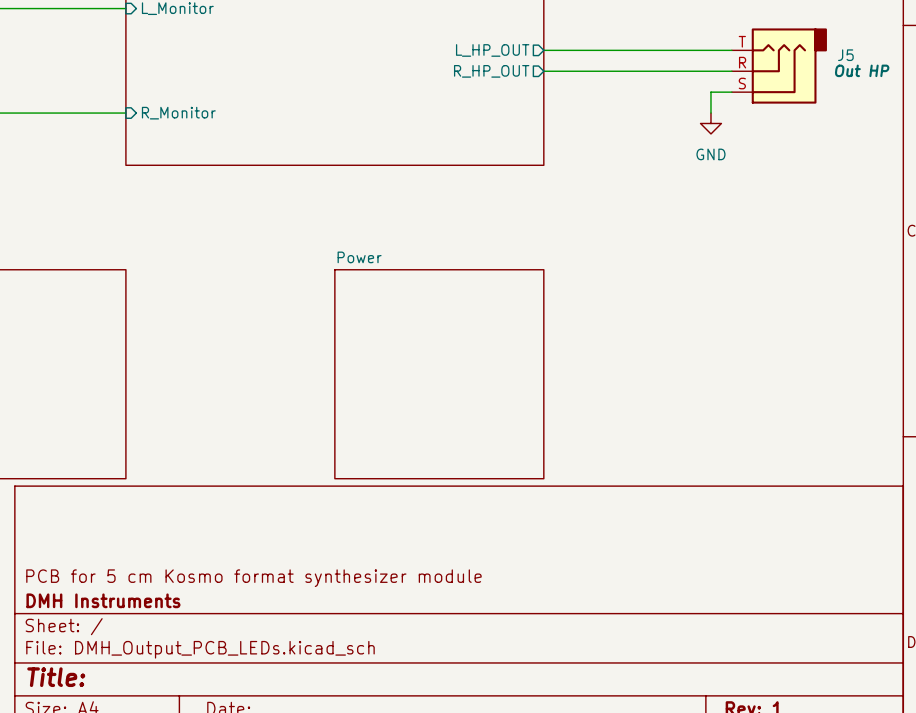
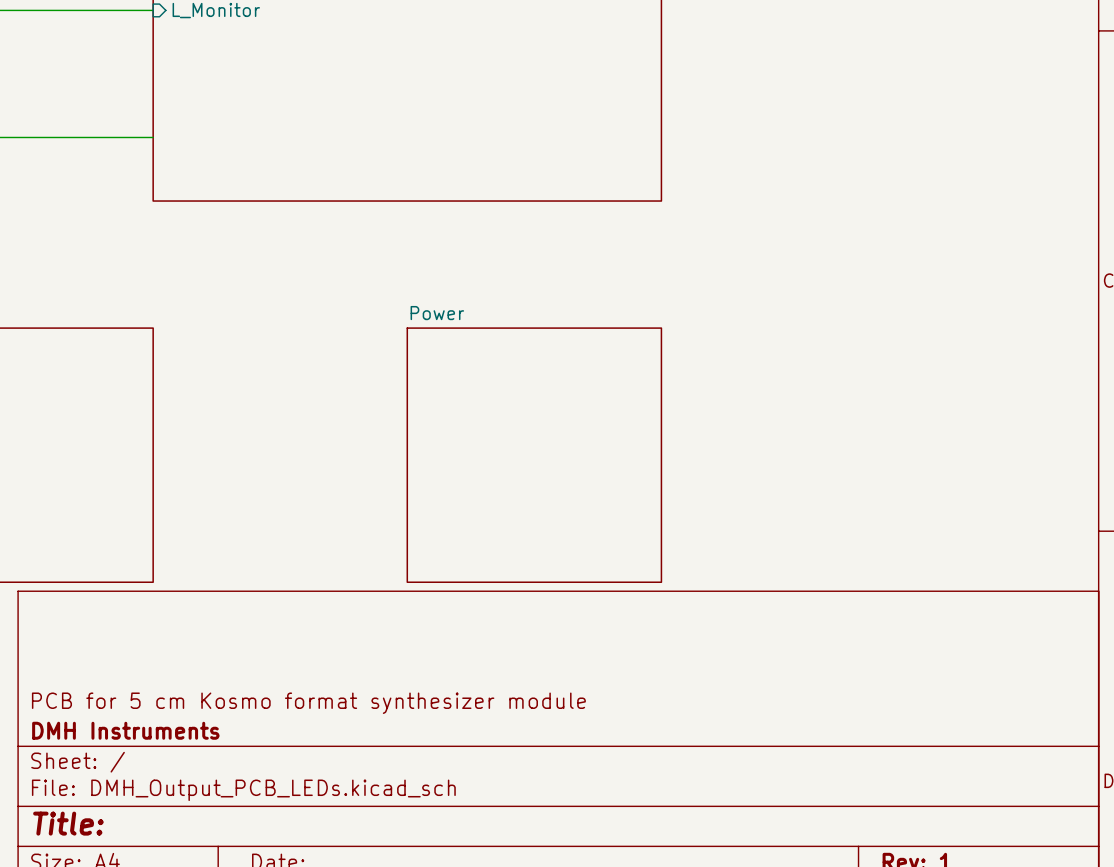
sheet pin: L_HP_OUT (492, 50) -> none
wire: (543, 50) (731, 50) -> none
J5: (779, 66) -> none
sheet pin: R_HP_OUT (491, 71) -> none
wire: (543, 71) (731, 71) -> none
wire: (731, 92) (710, 92) (710, 113) -> none
sheet pin: R_Monitor (178, 113) -> none
power symbol: GND (710, 123) -> none

